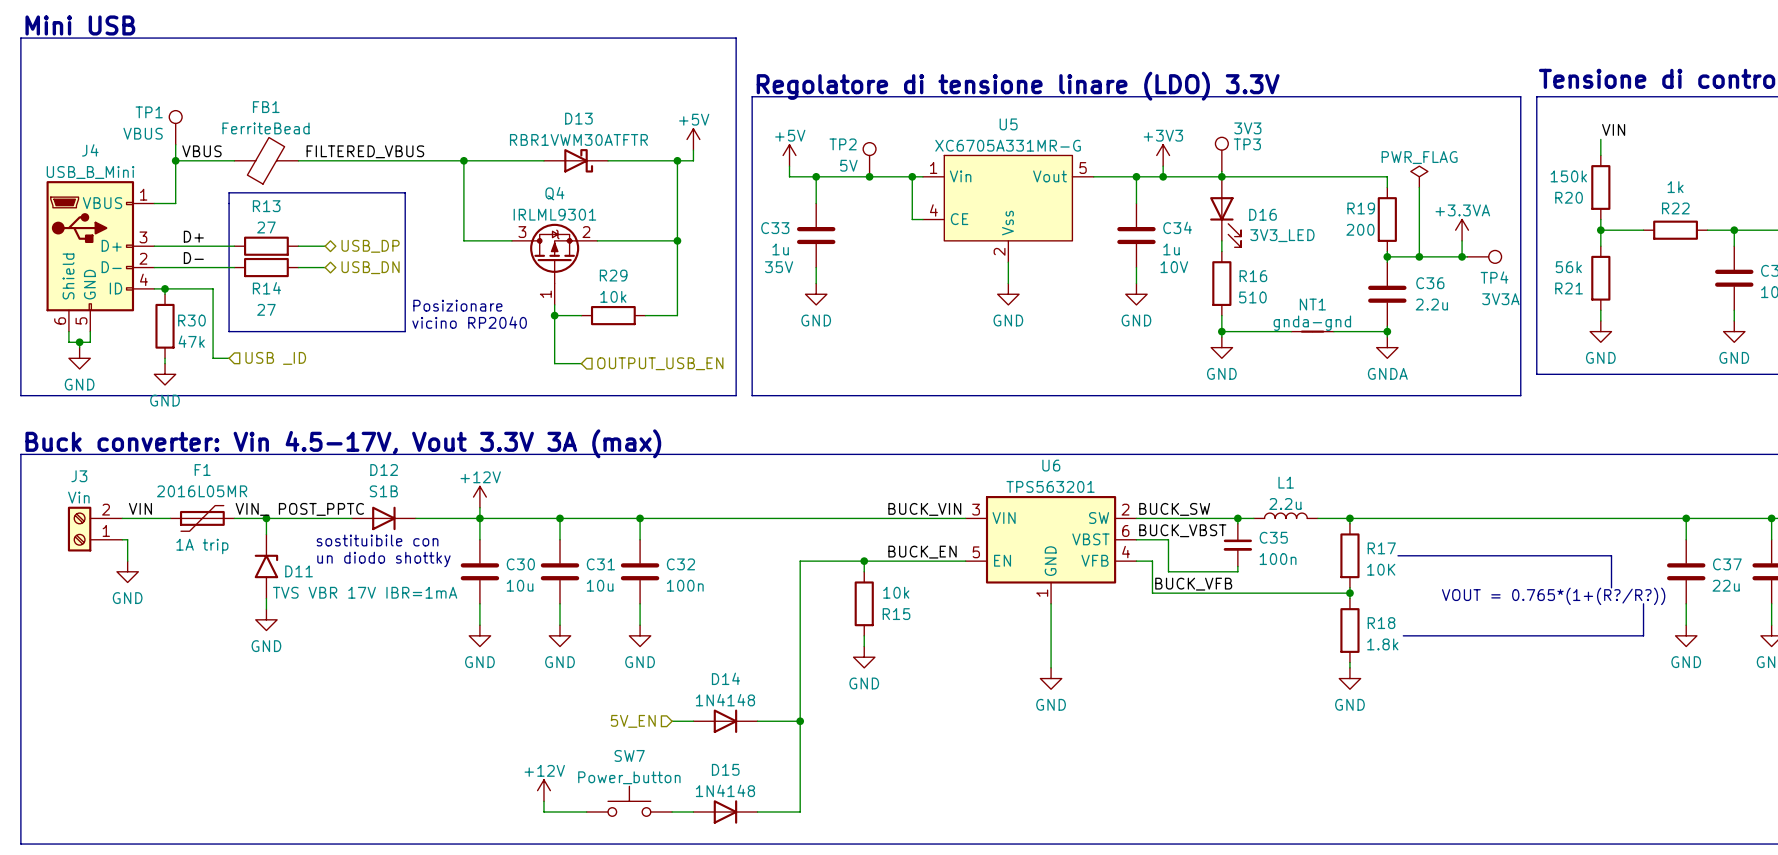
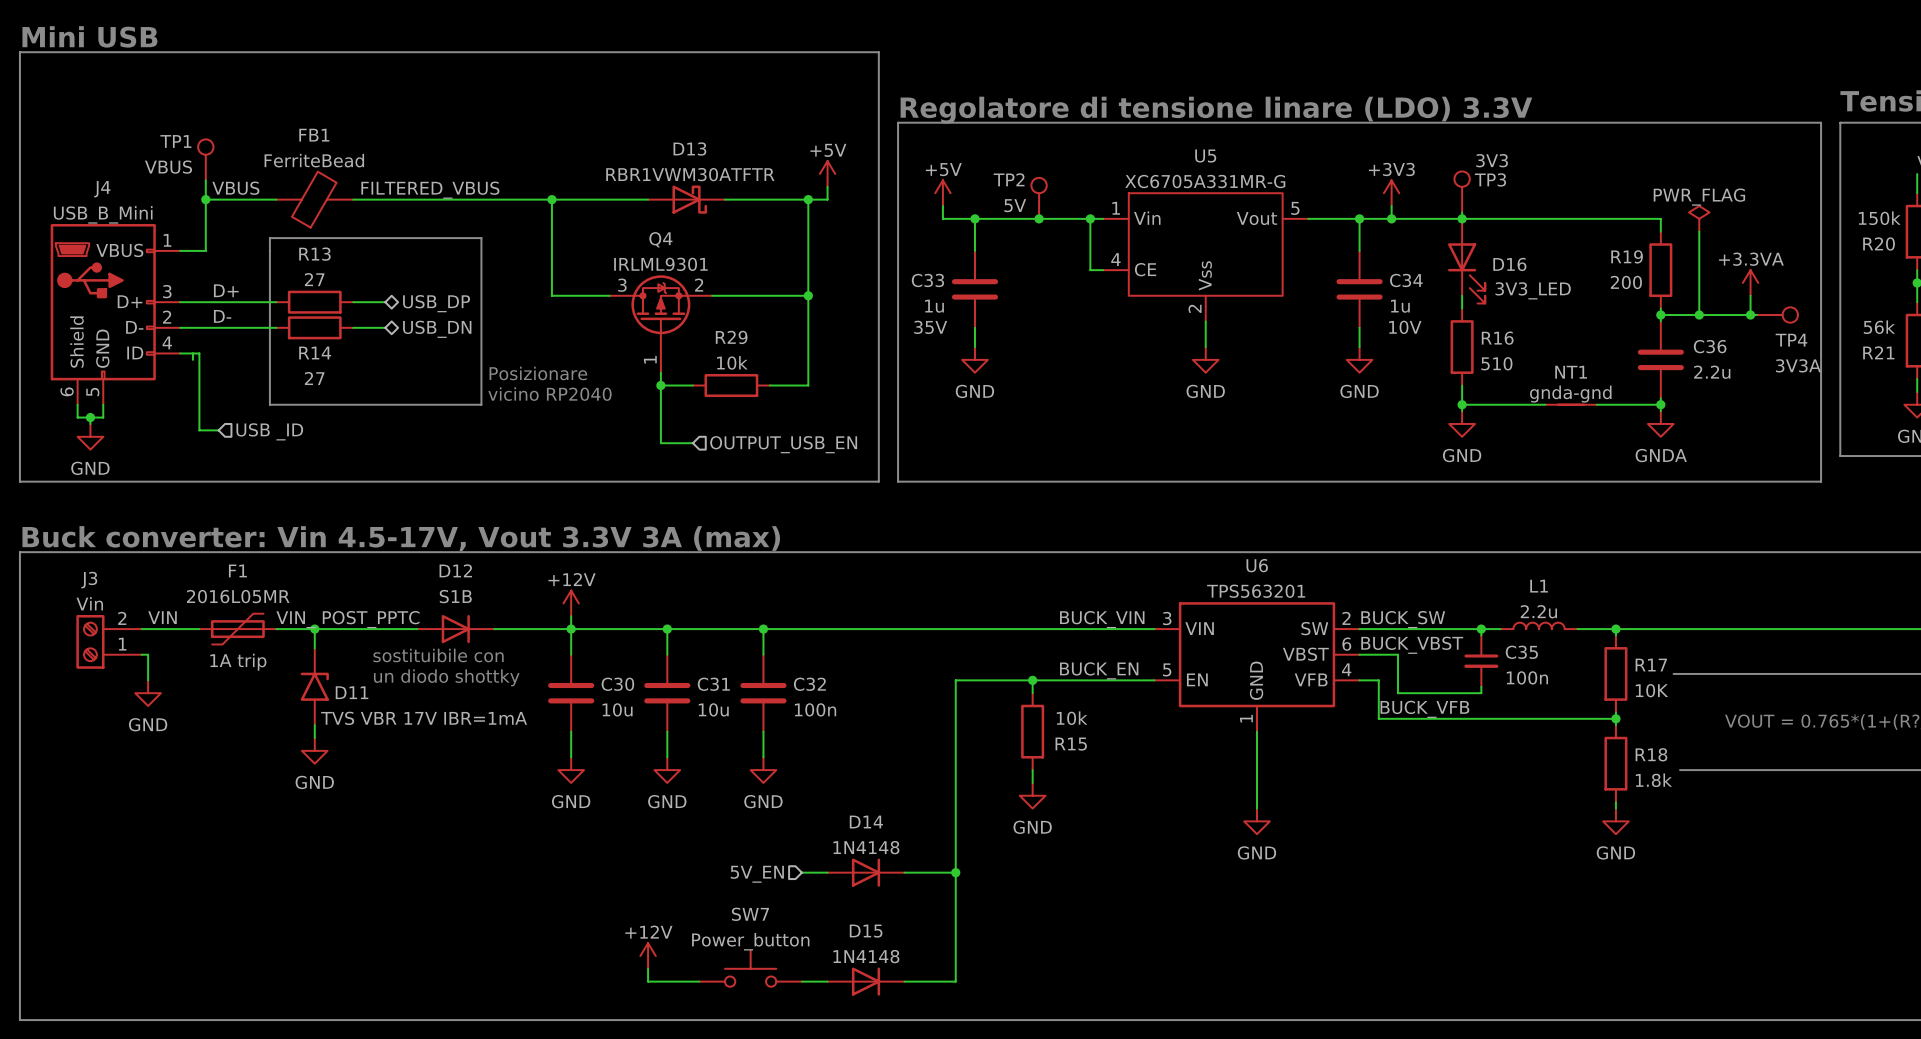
junction: (165, 288) -> none
wire: (170, 288) (213, 288) (213, 358) (229, 358) -> (199, 353) (199, 430) (218, 430)
R30: 47k (165, 326) -> none
wire: (165, 358) (165, 363) -> none
hierarchical label position: USB _ID (275, 358) -> USB _ID (269, 431)
power symbol: GND (165, 374) -> none

